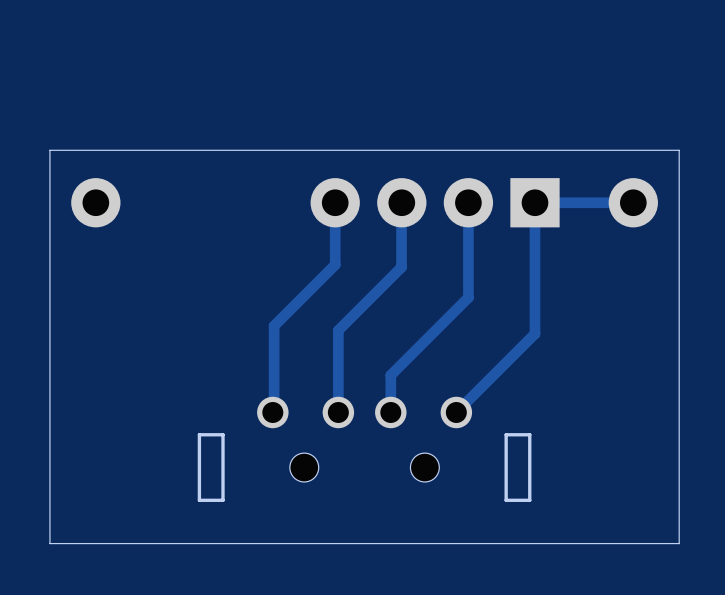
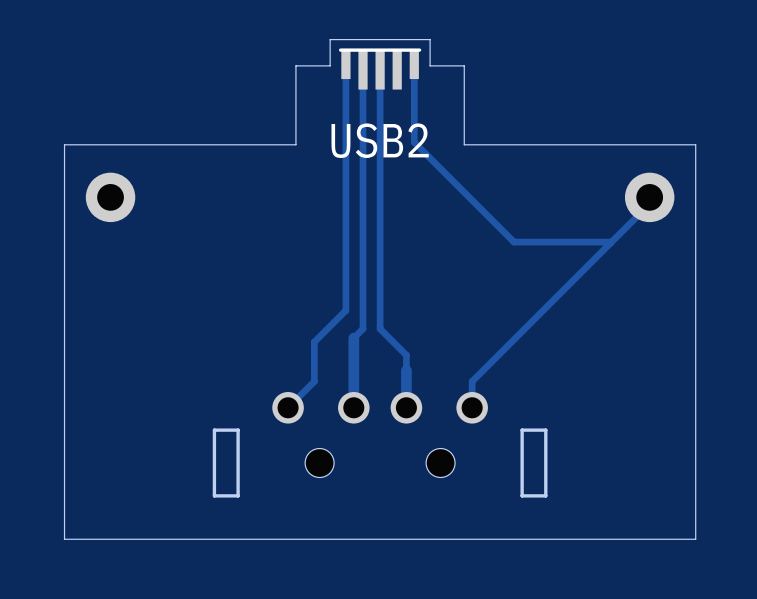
track: none -> (414, 64) (414, 142) (513, 242) (610, 242)
USB2: none -> (380, 69)
board edge: (448, 150) (280, 150) -> (464, 144) (464, 65) (430, 65) (430, 39) (330, 39) (330, 65) (295, 65) (295, 144)
track: (335, 202) (335, 264) (274, 325) (274, 411) -> (345, 64) (345, 310) (314, 342) (314, 381) (289, 406)
part: (435, 202) -> none
track: (468, 202) (468, 297) (390, 375) -> (380, 69) (380, 328) (406, 355) (406, 370)
track: (633, 202) (535, 202) (535, 333) (456, 412) -> (656, 197) (472, 381) (472, 407)
track: (401, 203) (401, 267) (338, 330) (338, 343) -> (363, 69) (363, 328) (353, 338)

